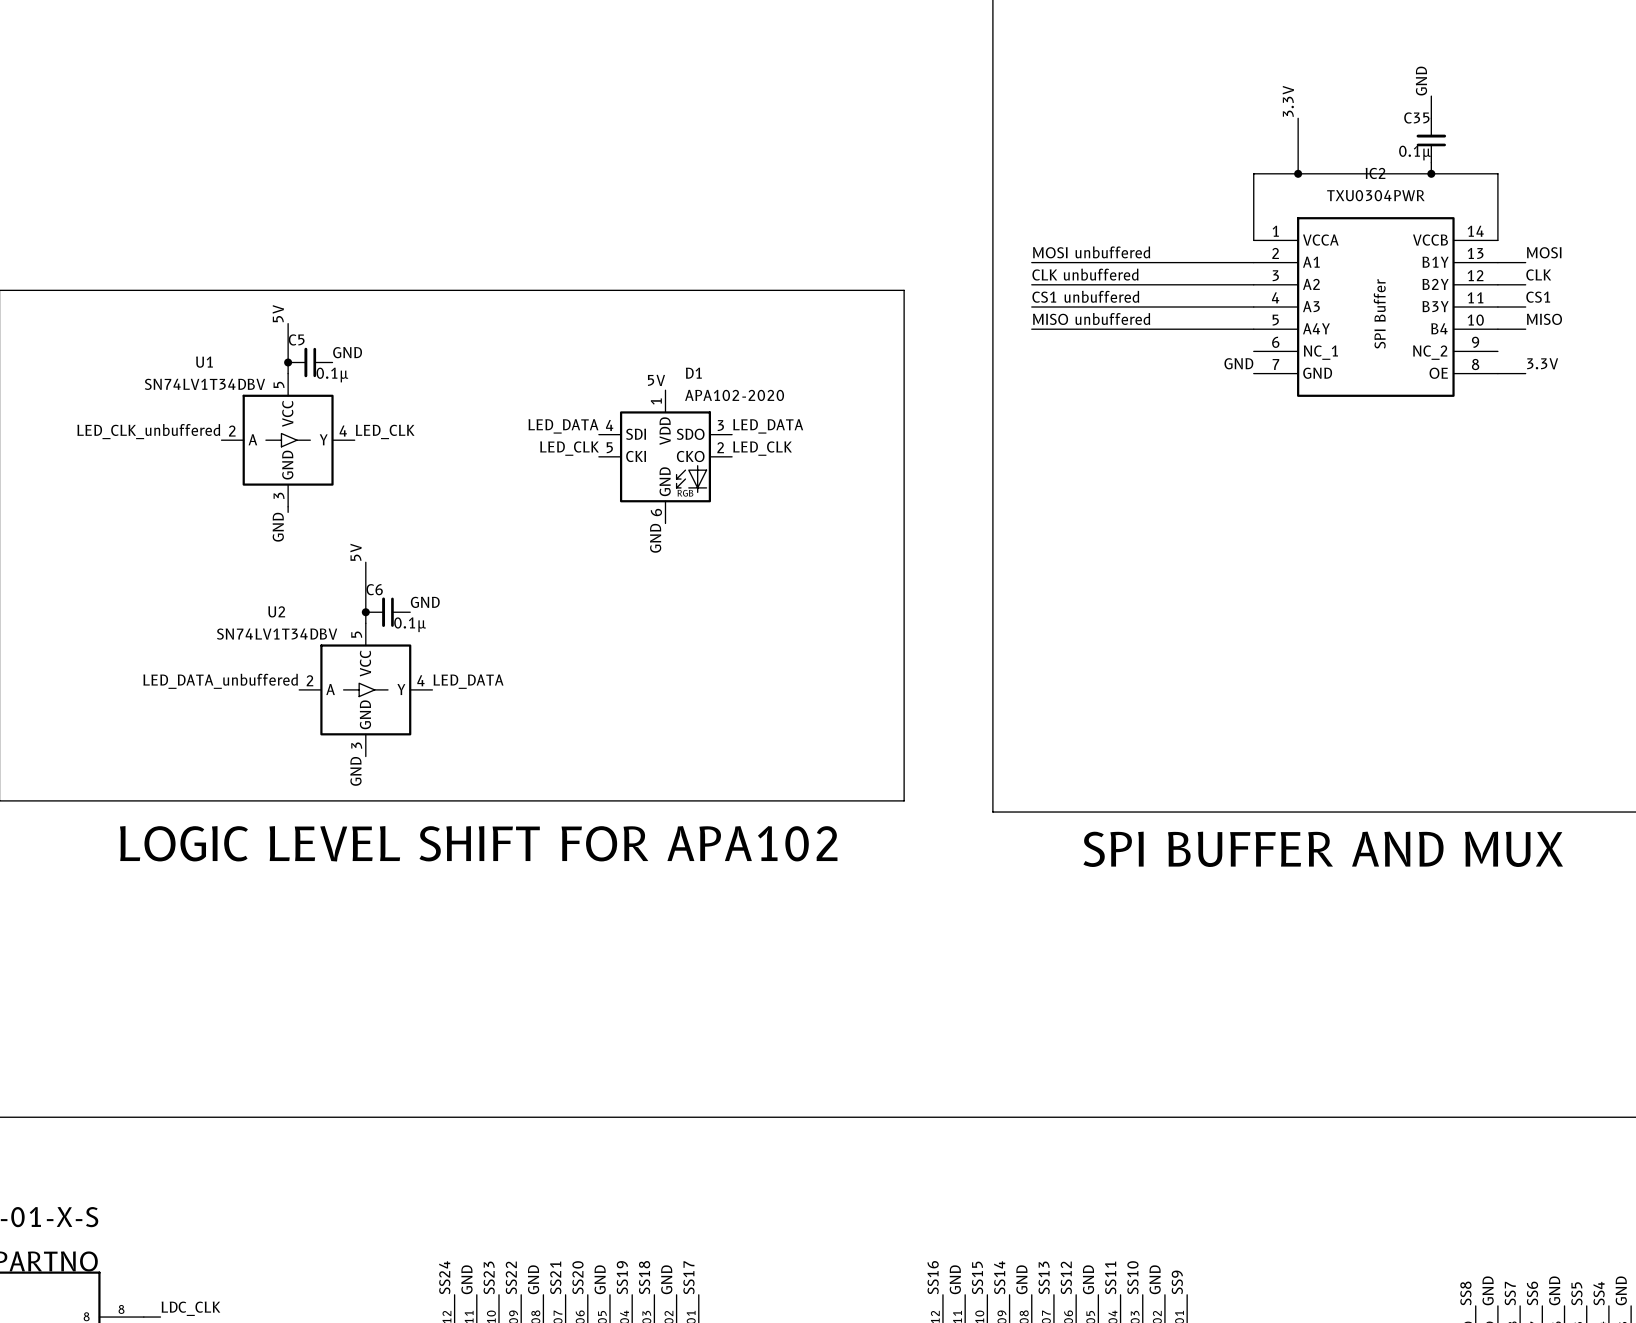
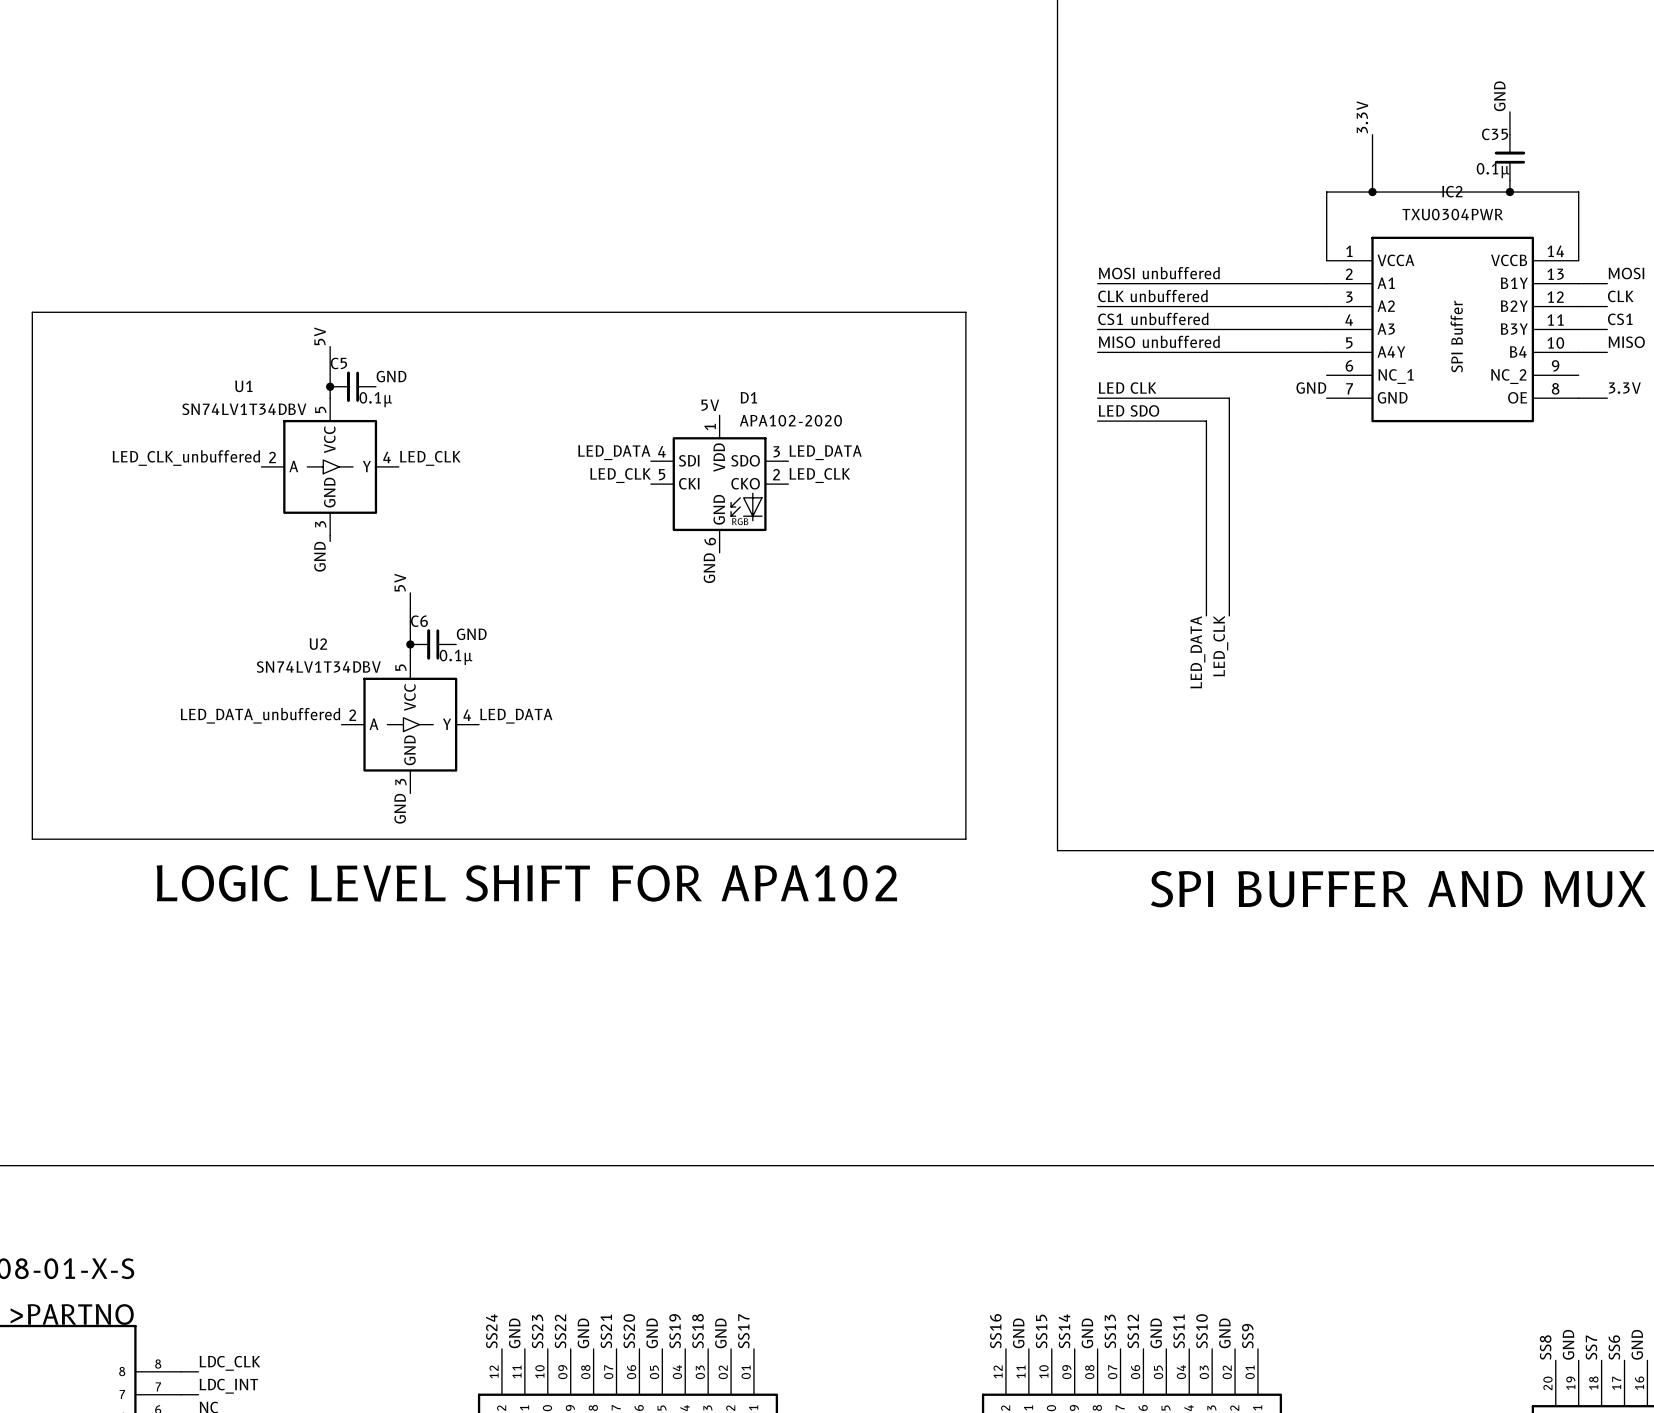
label: none -> LED CLK (1127, 388)
wire: none -> (1097, 398) (1229, 398) (1229, 615)
label: none -> LED SDO (1129, 410)
wire: none -> (1097, 421) (1206, 421) (1206, 615)
label: none -> LED_CLK (1220, 646)
label: none -> LED_DATA (1197, 652)

